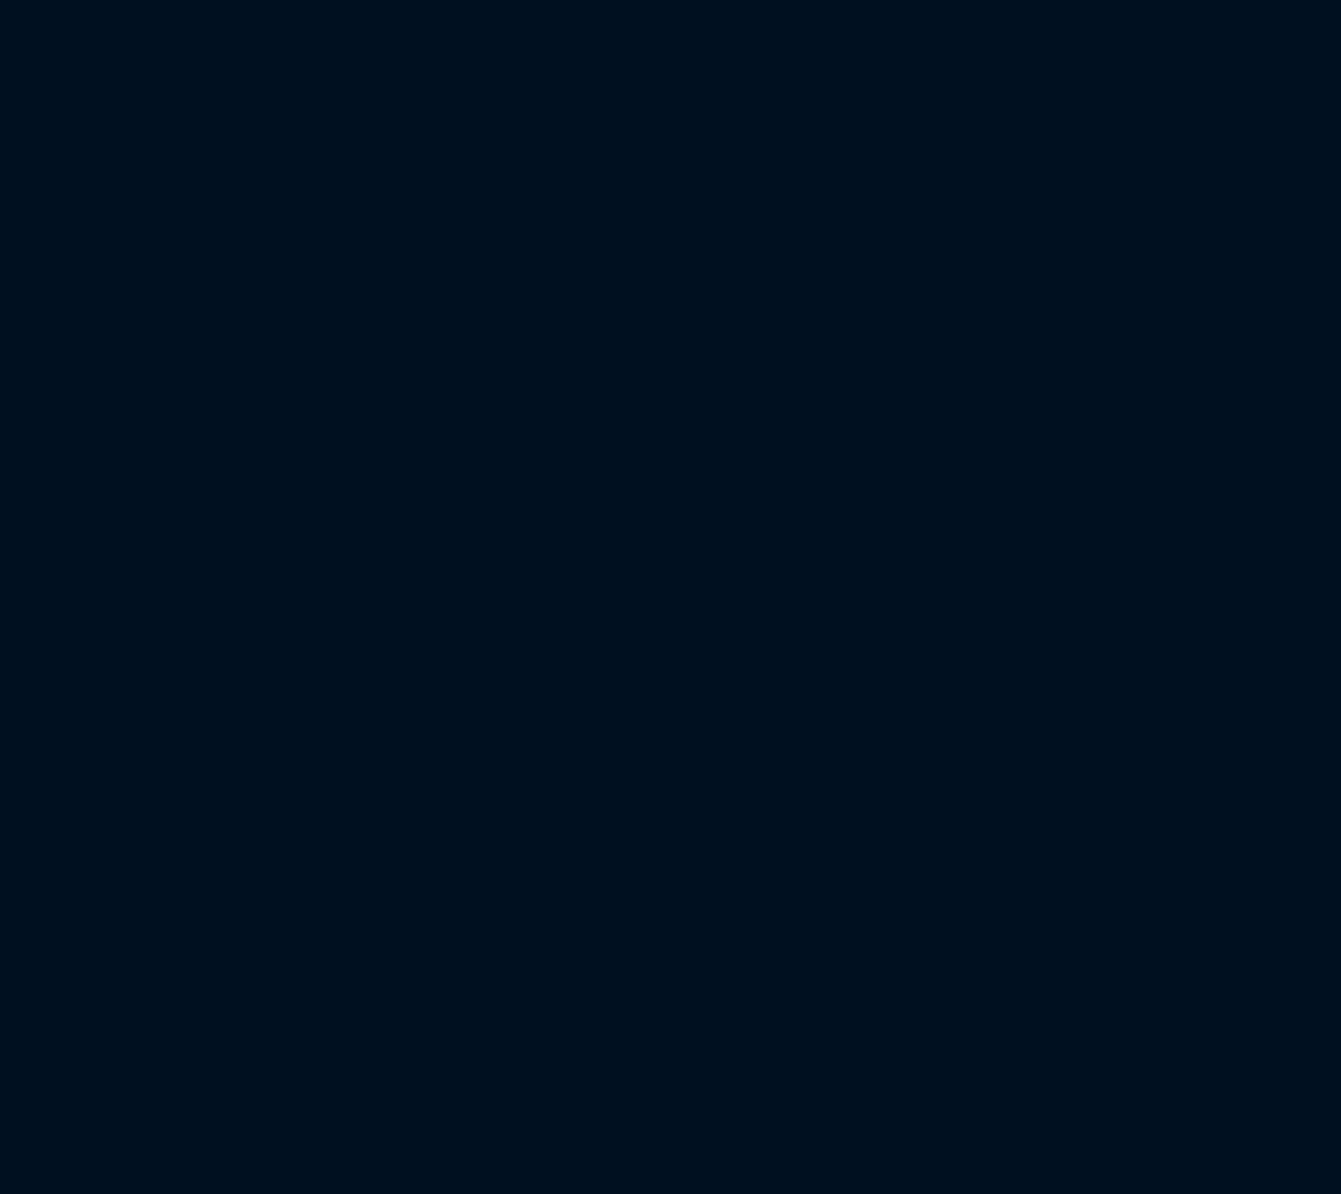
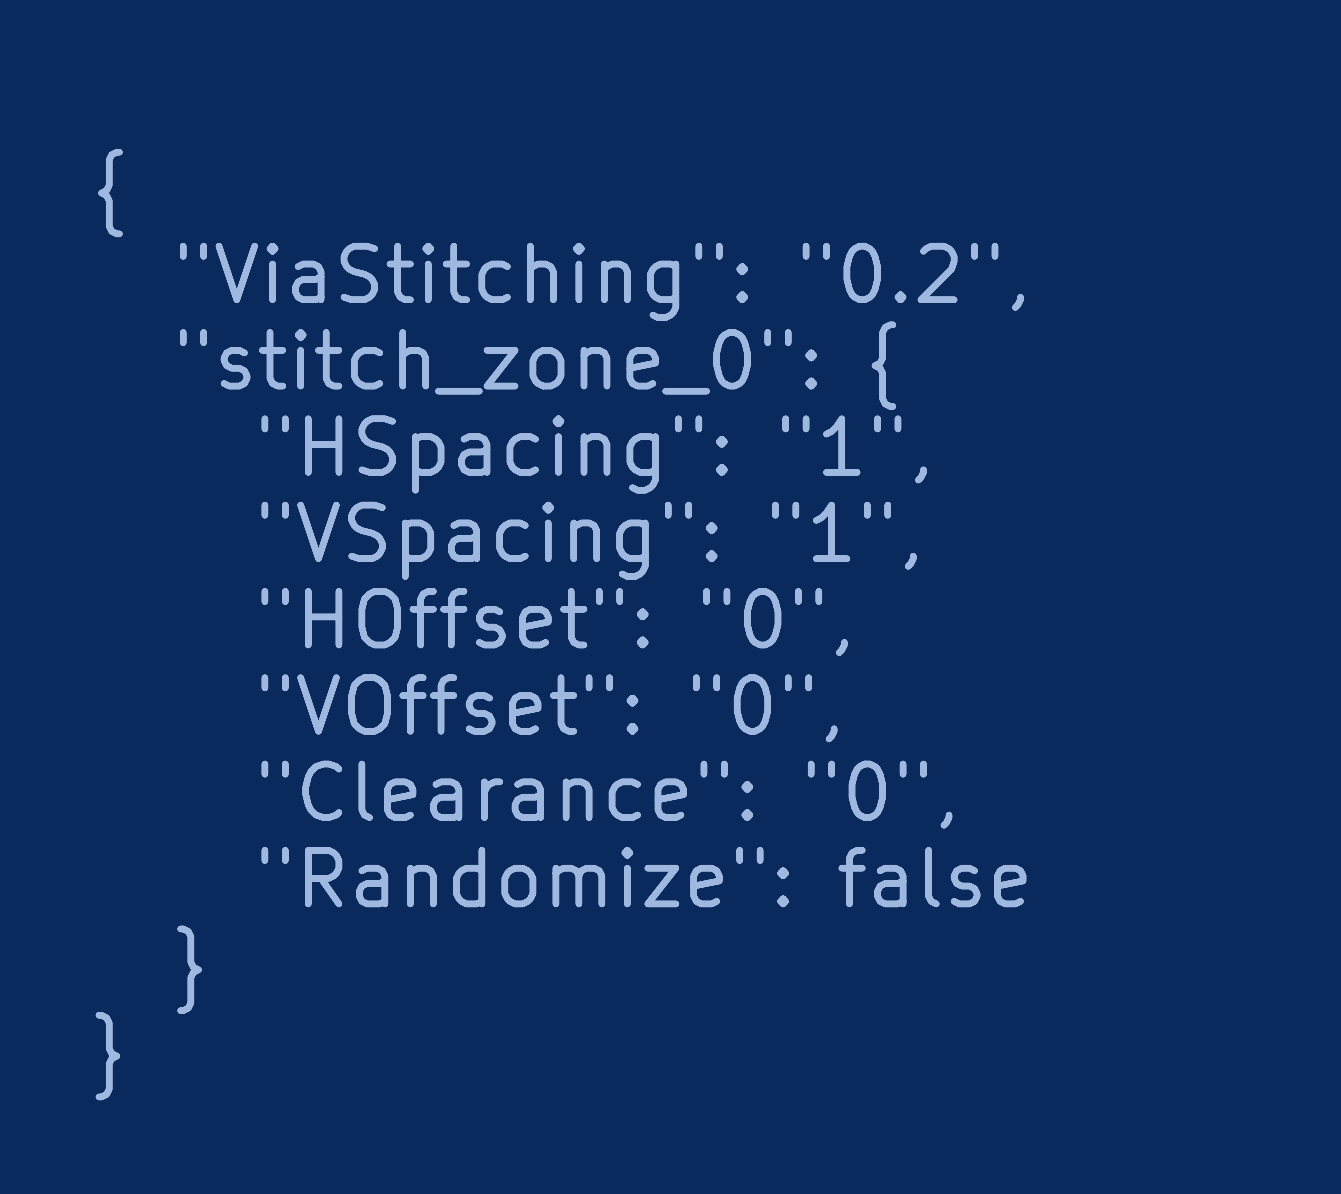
text: none -> { (110, 193)
text: none -> "ViaStitching": "0.2", (601, 281)
text: none -> "stitch_zone_0": { (538, 365)
text: none -> "HSpacing": "1", (594, 454)
text: none -> "VSpacing": "1", (589, 540)
text: none -> "HOffset": "0", (554, 622)
text: none -> "VOffset": "0", (549, 708)
text: none -> "Clearance": "0", (606, 794)
text: none -> "Randomize": false (643, 877)
text: none -> } (189, 969)
text: none -> } (107, 1056)

